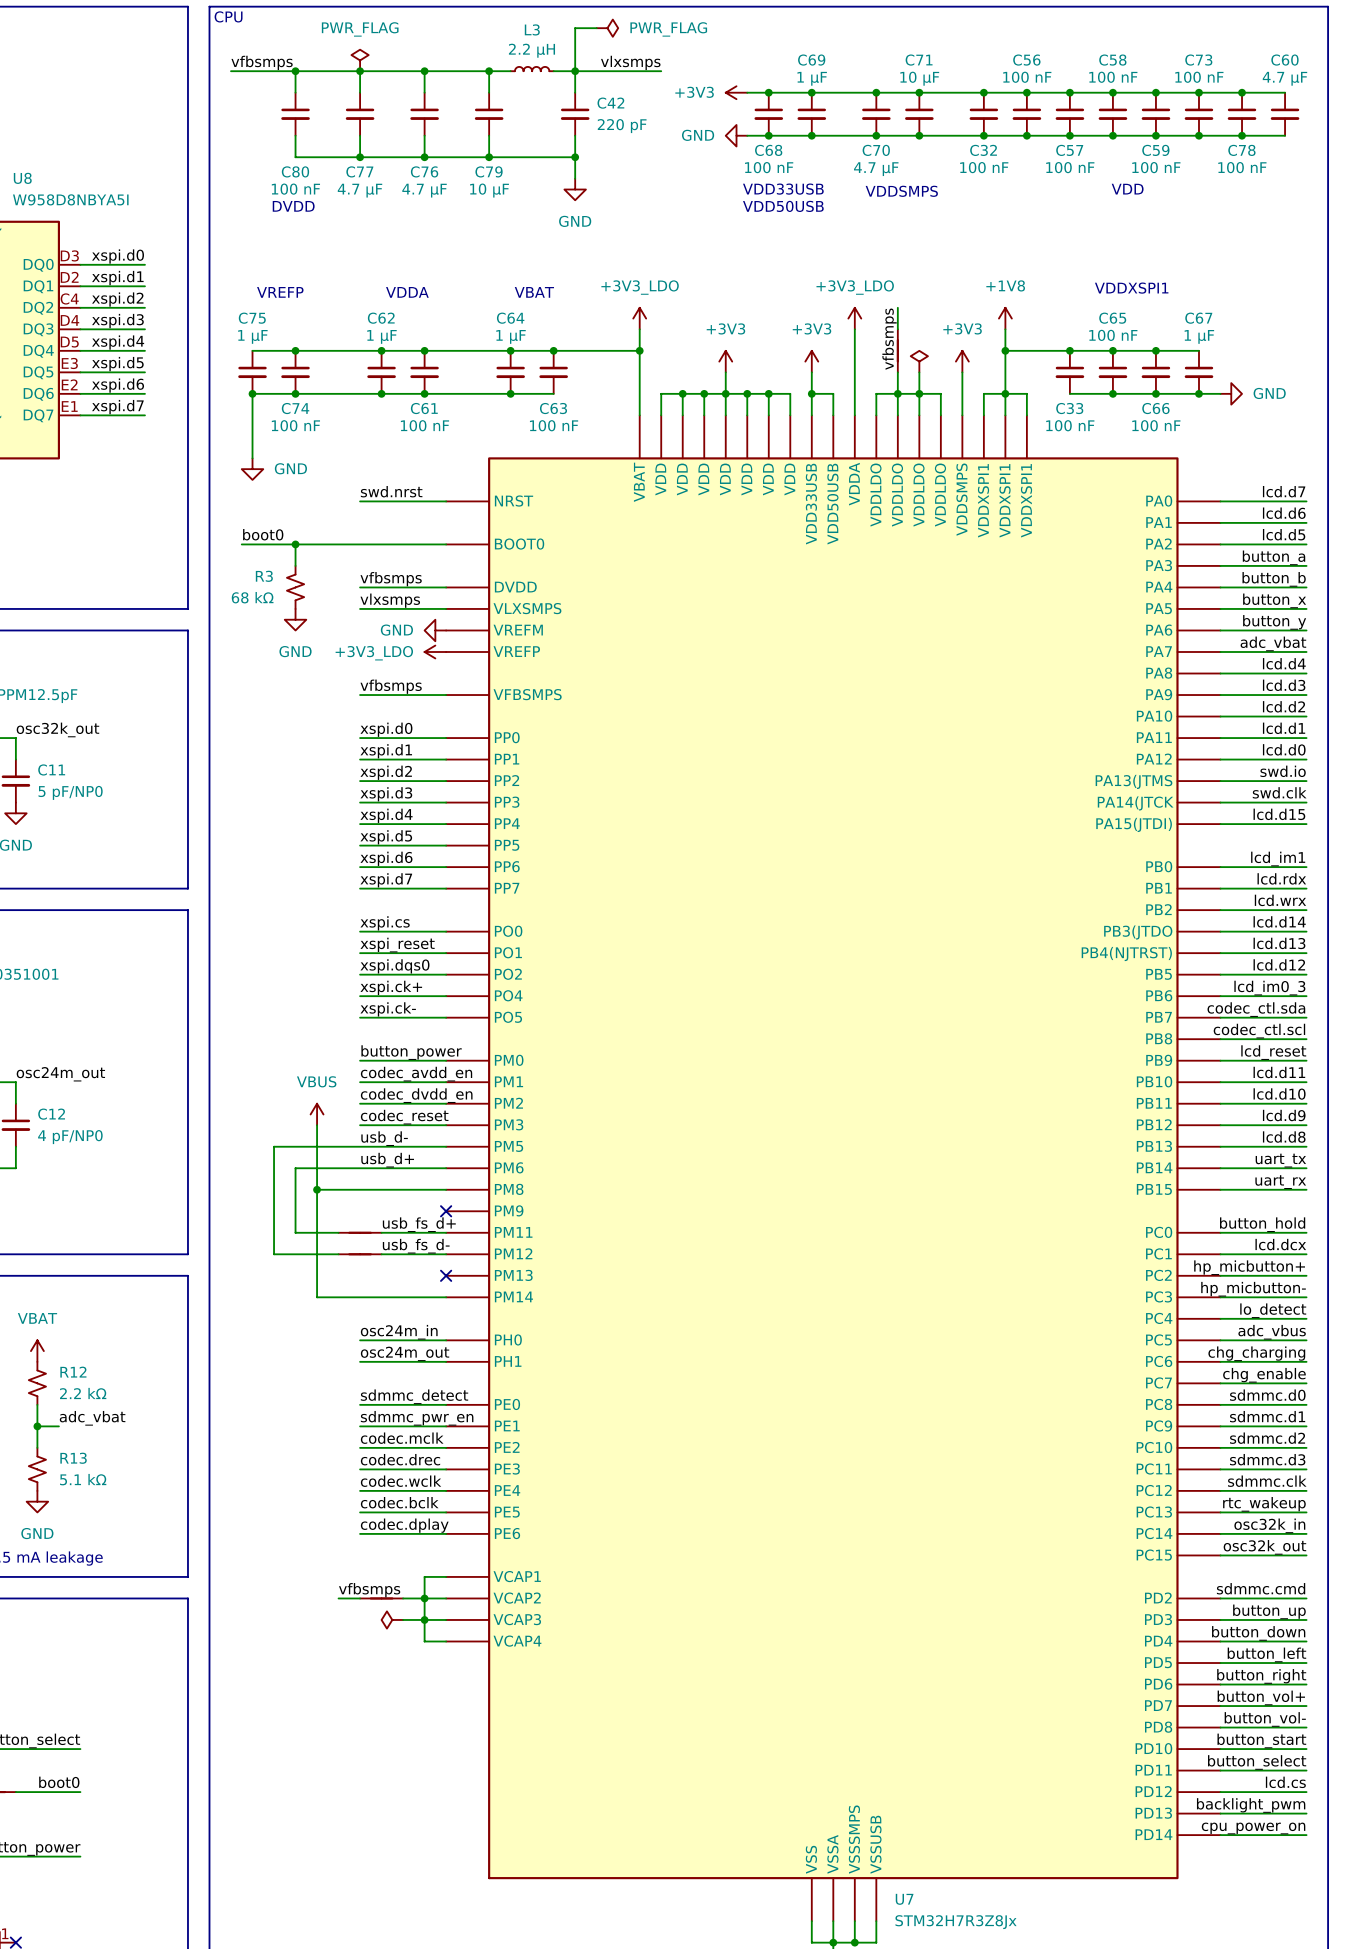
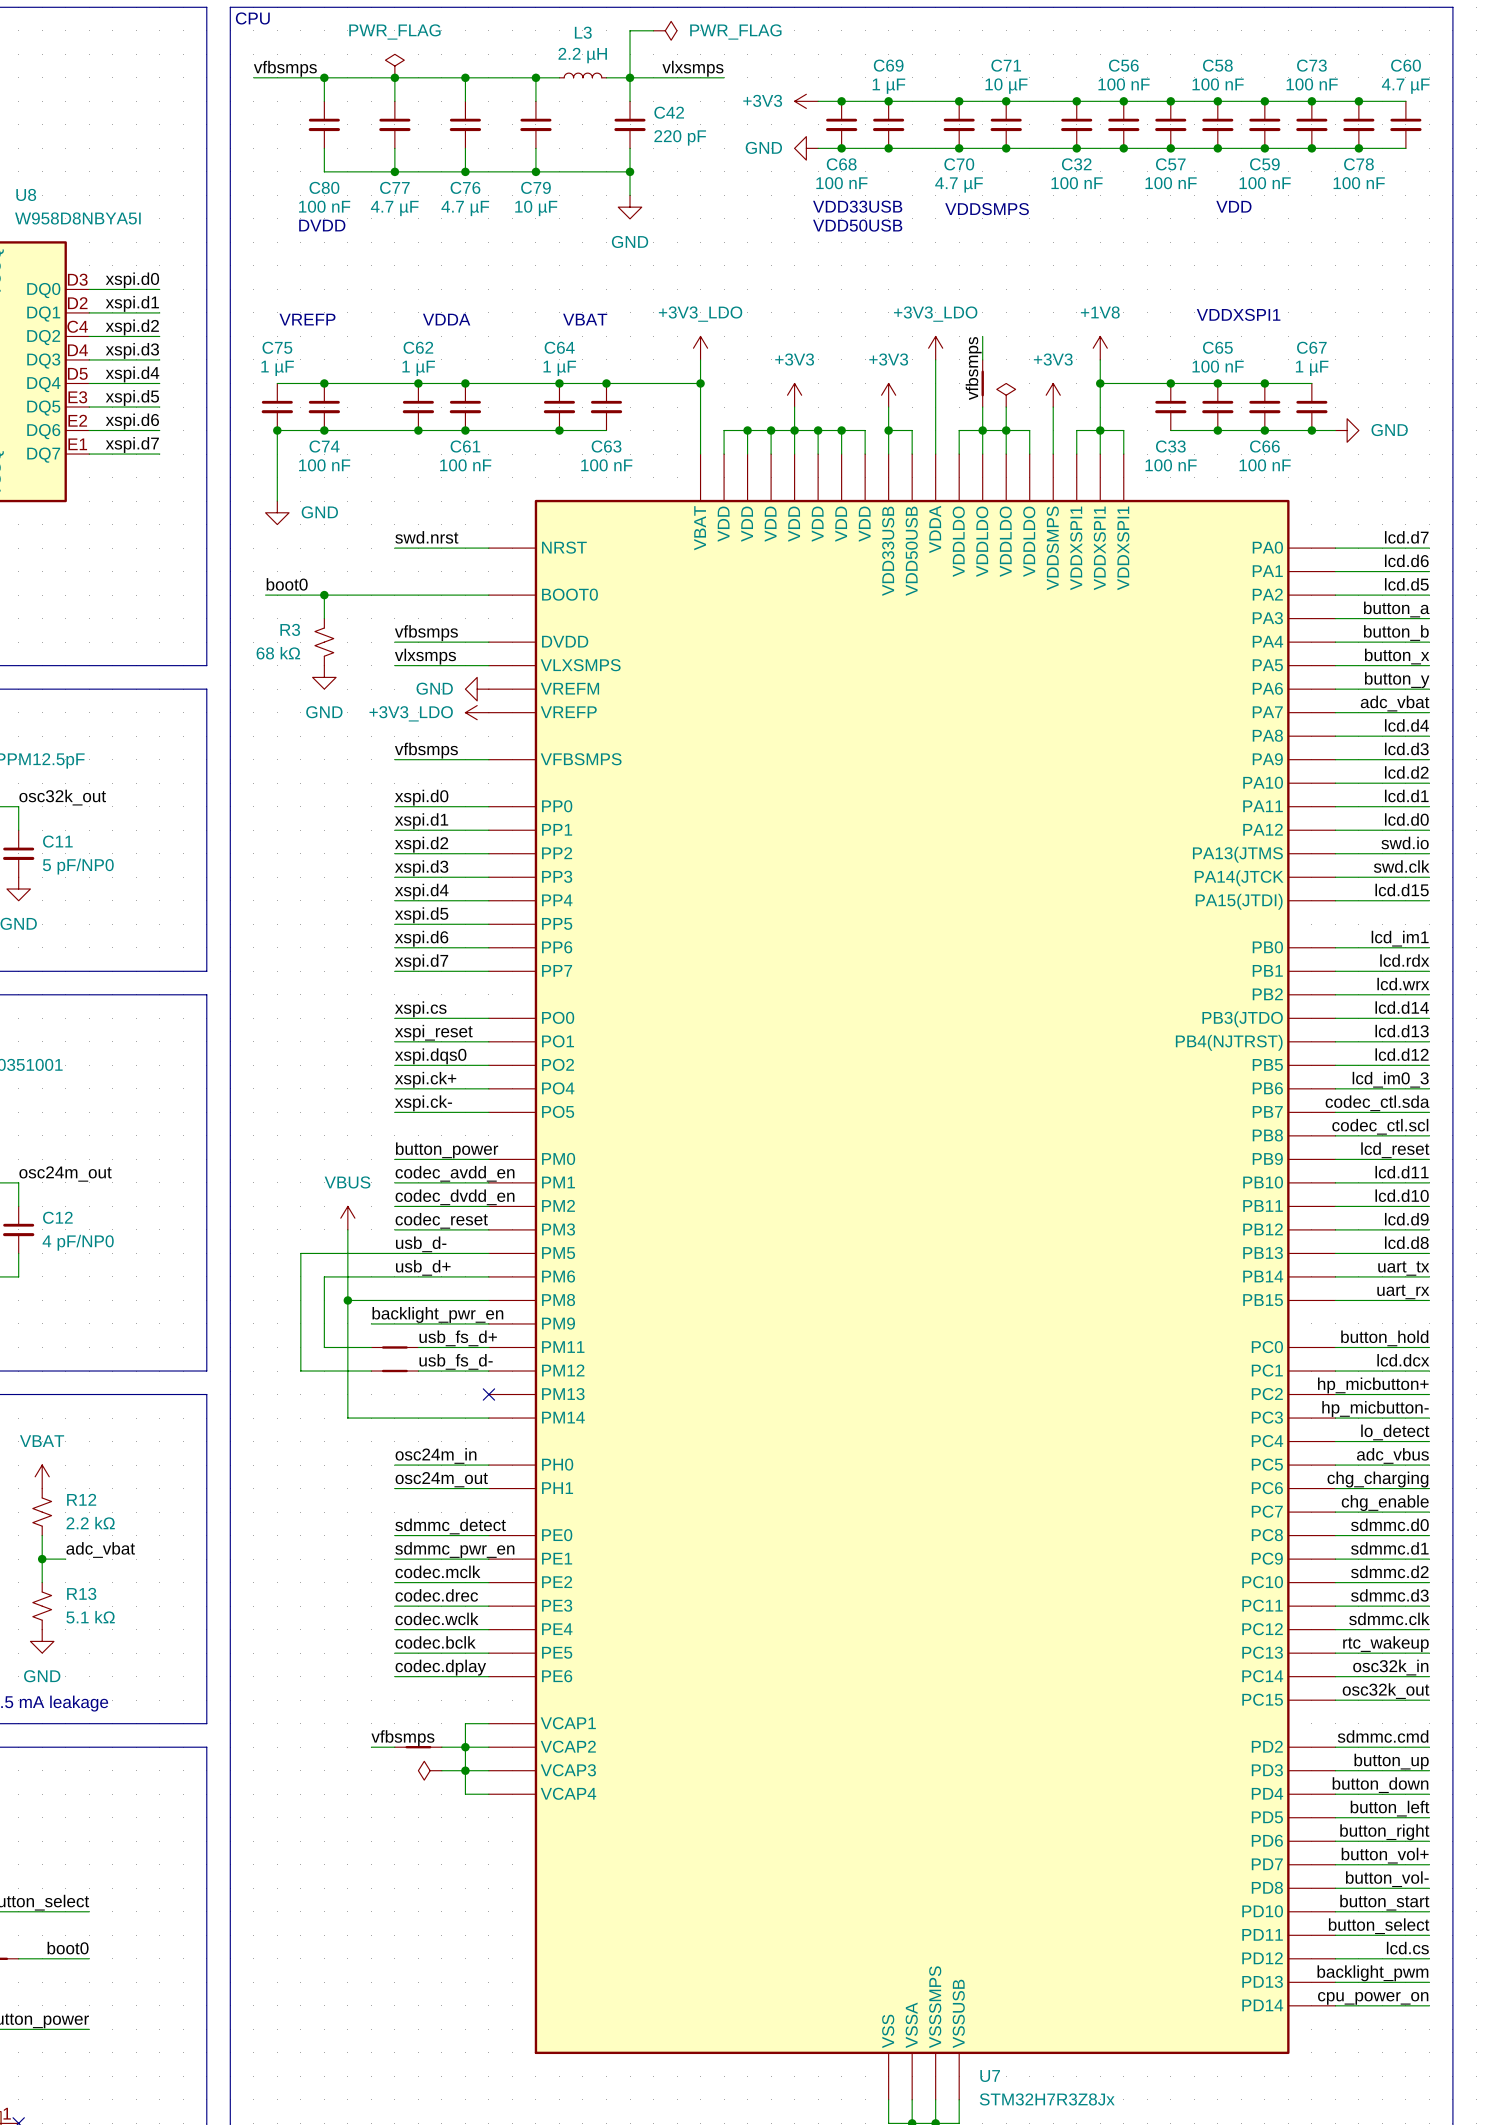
label: none -> backlight_pwr_en (437, 1314)
wire: none -> (371, 1323) (488, 1323)
no-connect mark: (446, 1211) -> none

